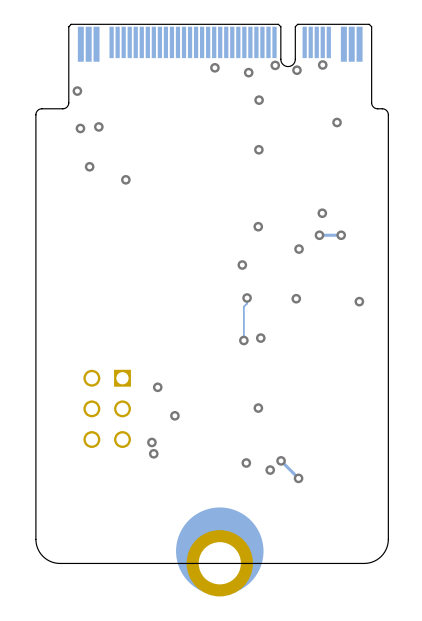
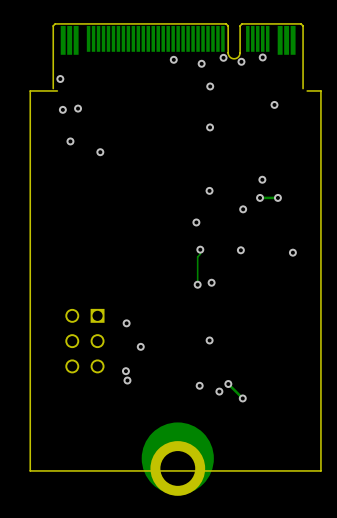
board edge: (371, 102) (374, 107) (385, 110) (388, 114) (388, 539) (384, 552) (377, 559) (364, 563) (60, 563) (49, 561) (42, 556) (37, 547) (35, 539) (35, 114) (39, 109) (64, 108) (68, 102) -> none
board edge: none -> (307, 90) (320, 90) (320, 470) (30, 470) (30, 90) (57, 90)
via: (151, 442) -> none
via: none -> (125, 371)
via: (153, 453) -> none
via: none -> (127, 380)

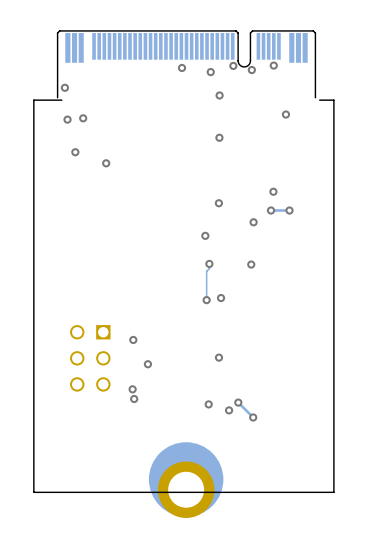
via: (292, 252) -> none

